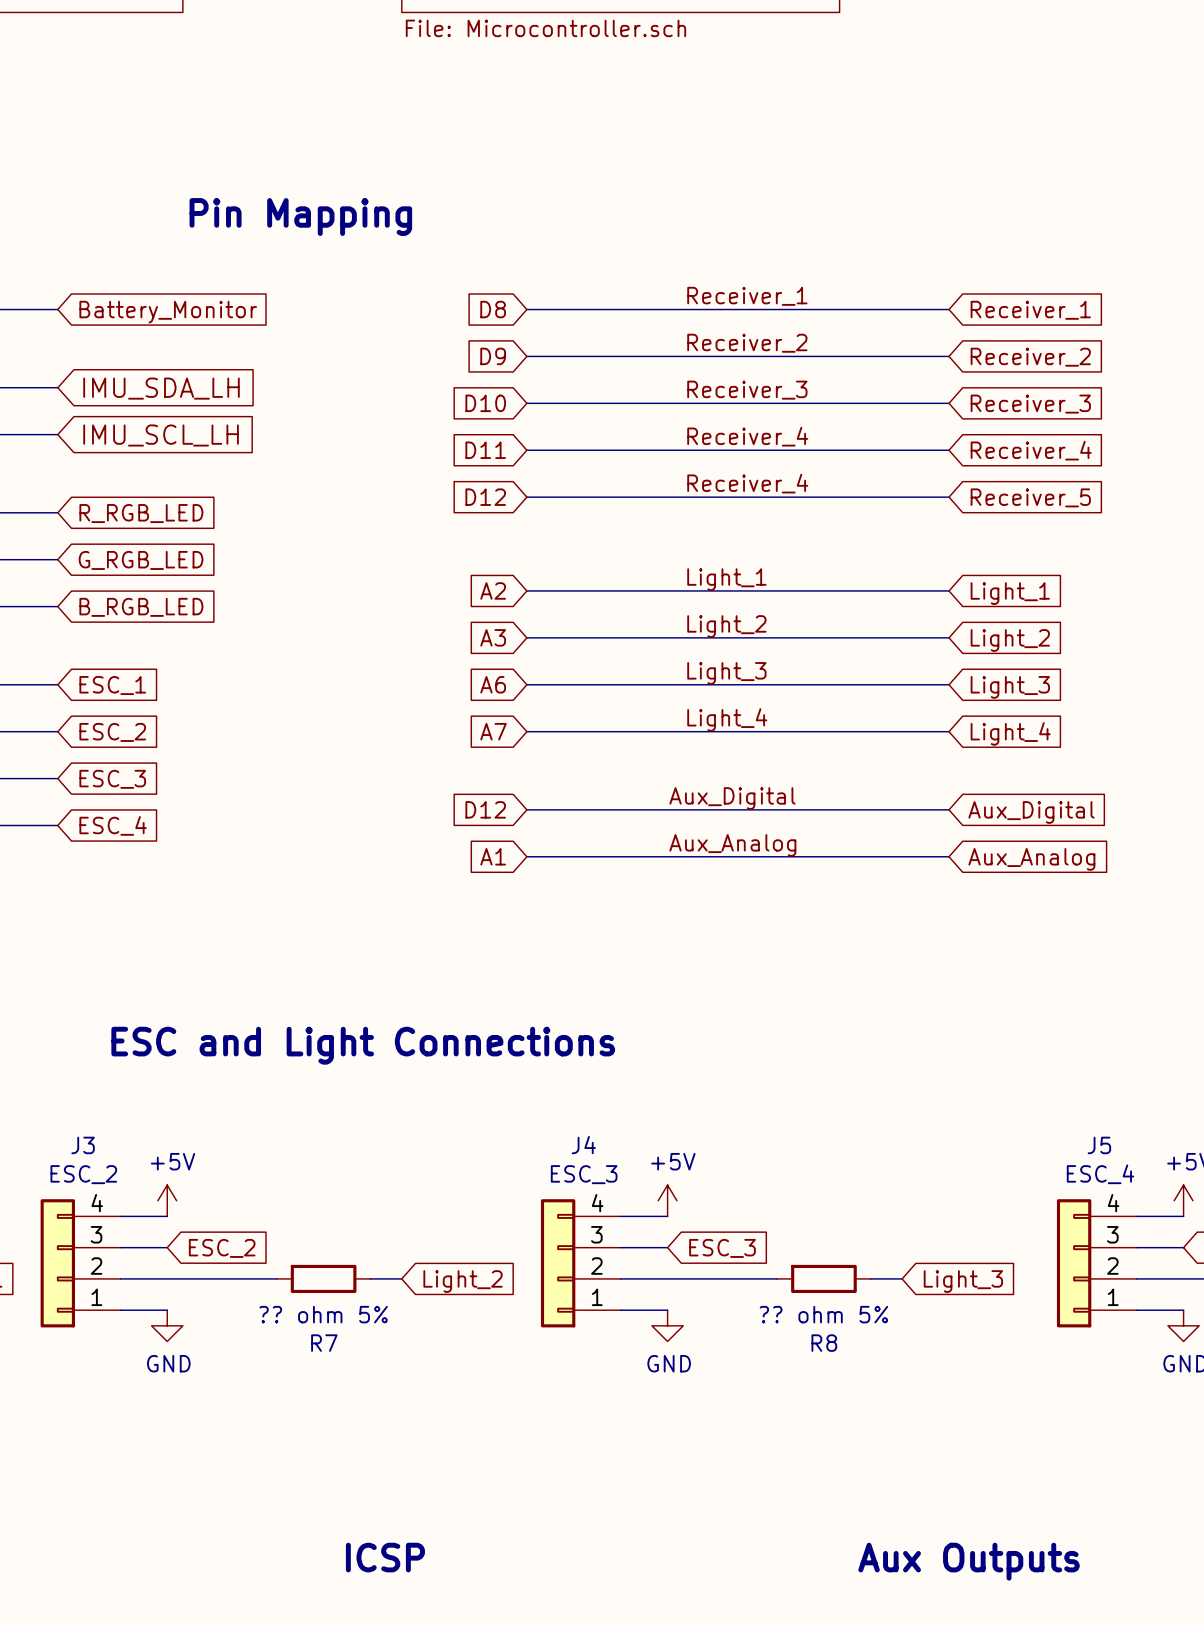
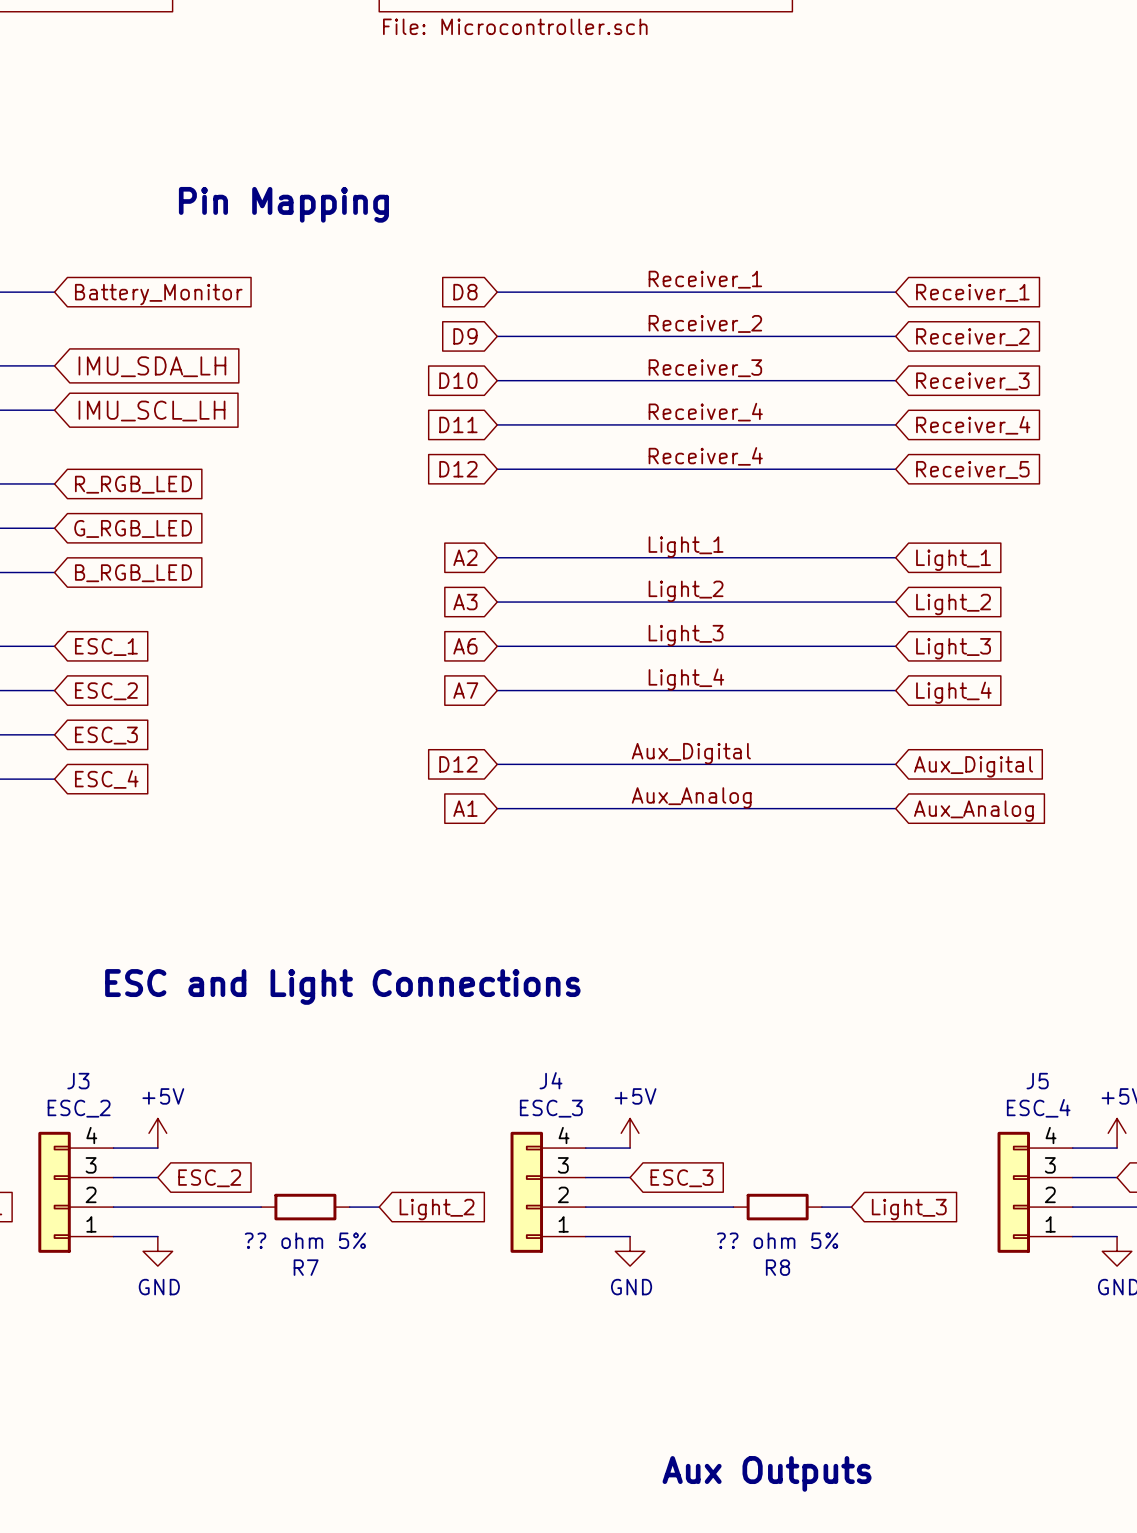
text: ICSP (385, 1557) -> none
text position: Aux Outputs (969, 1561) -> Aux Outputs (767, 1473)

